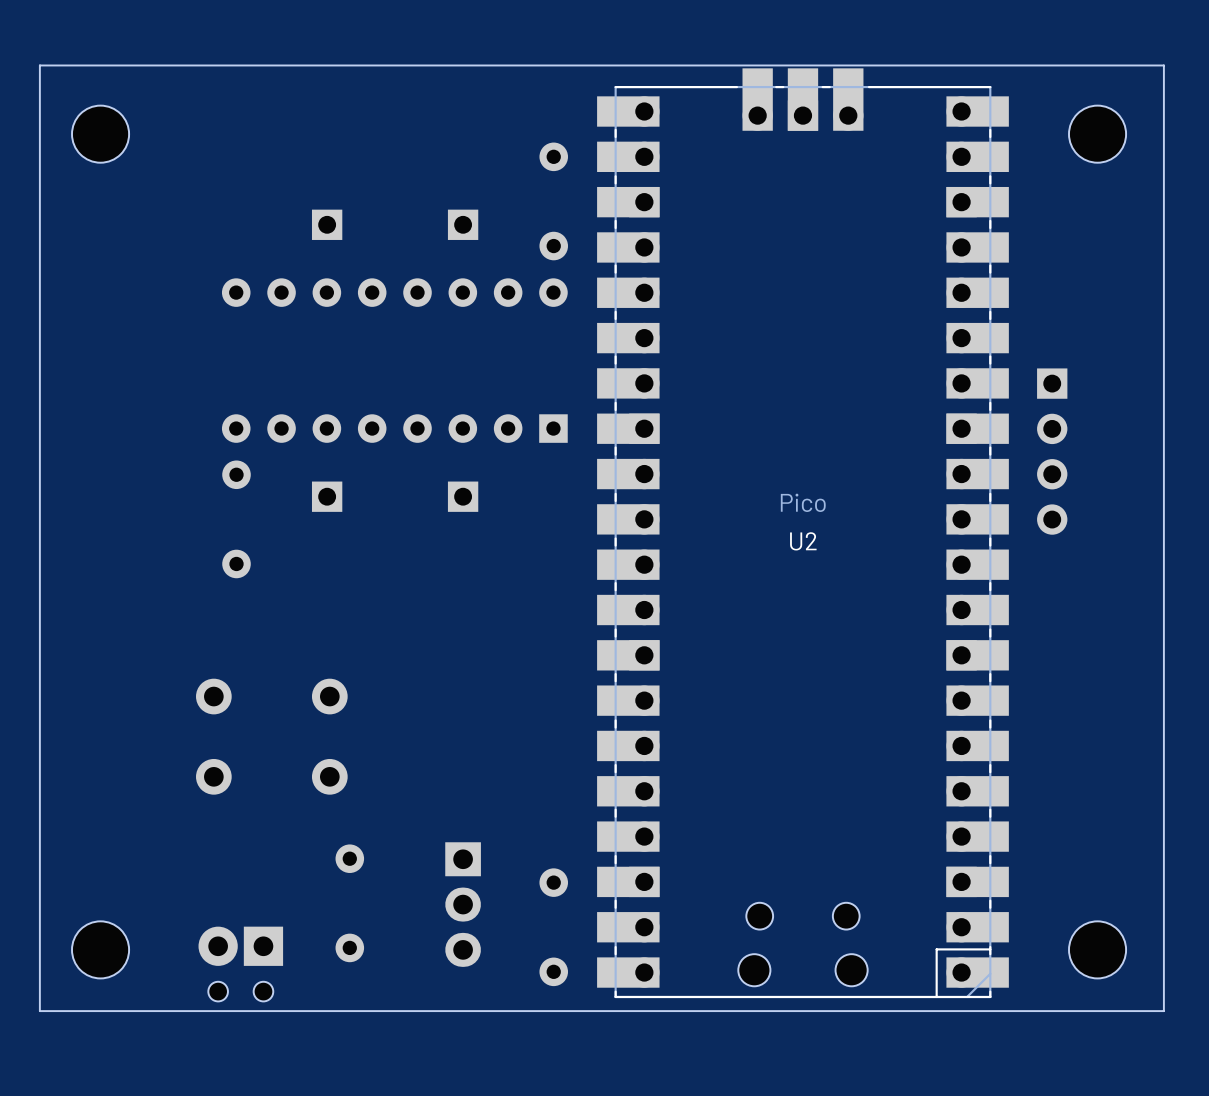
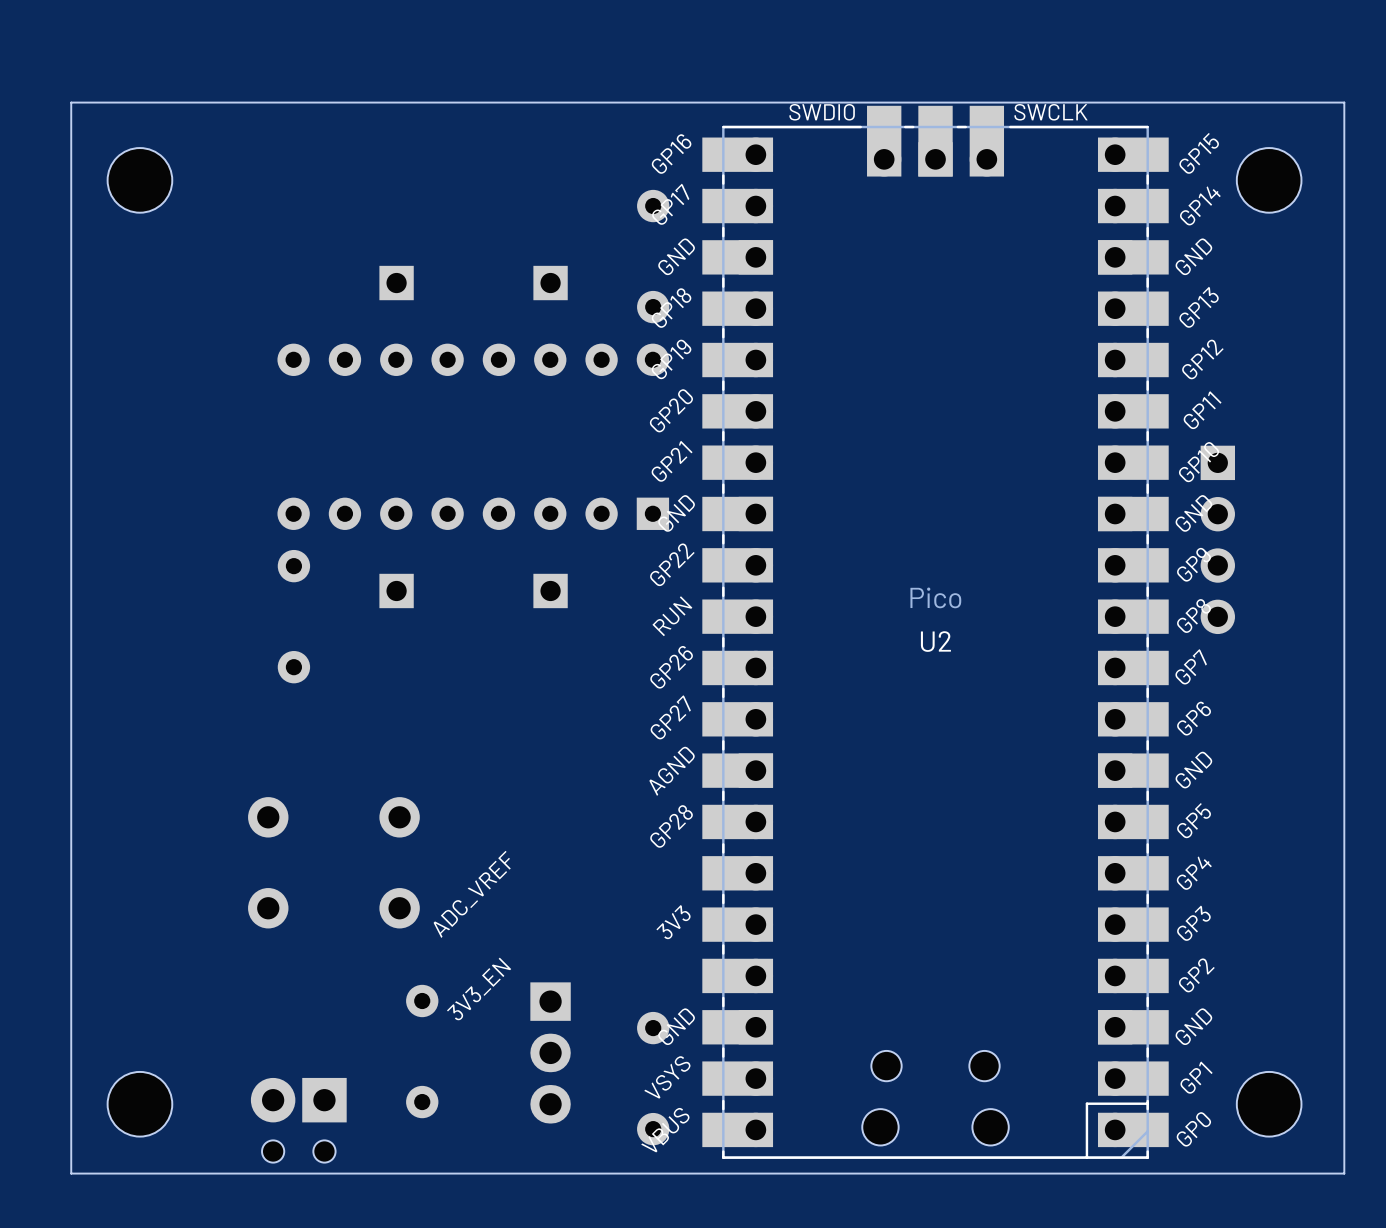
U2 footprint: [597, 68, 1009, 999] -> [702, 105, 1169, 1159]

